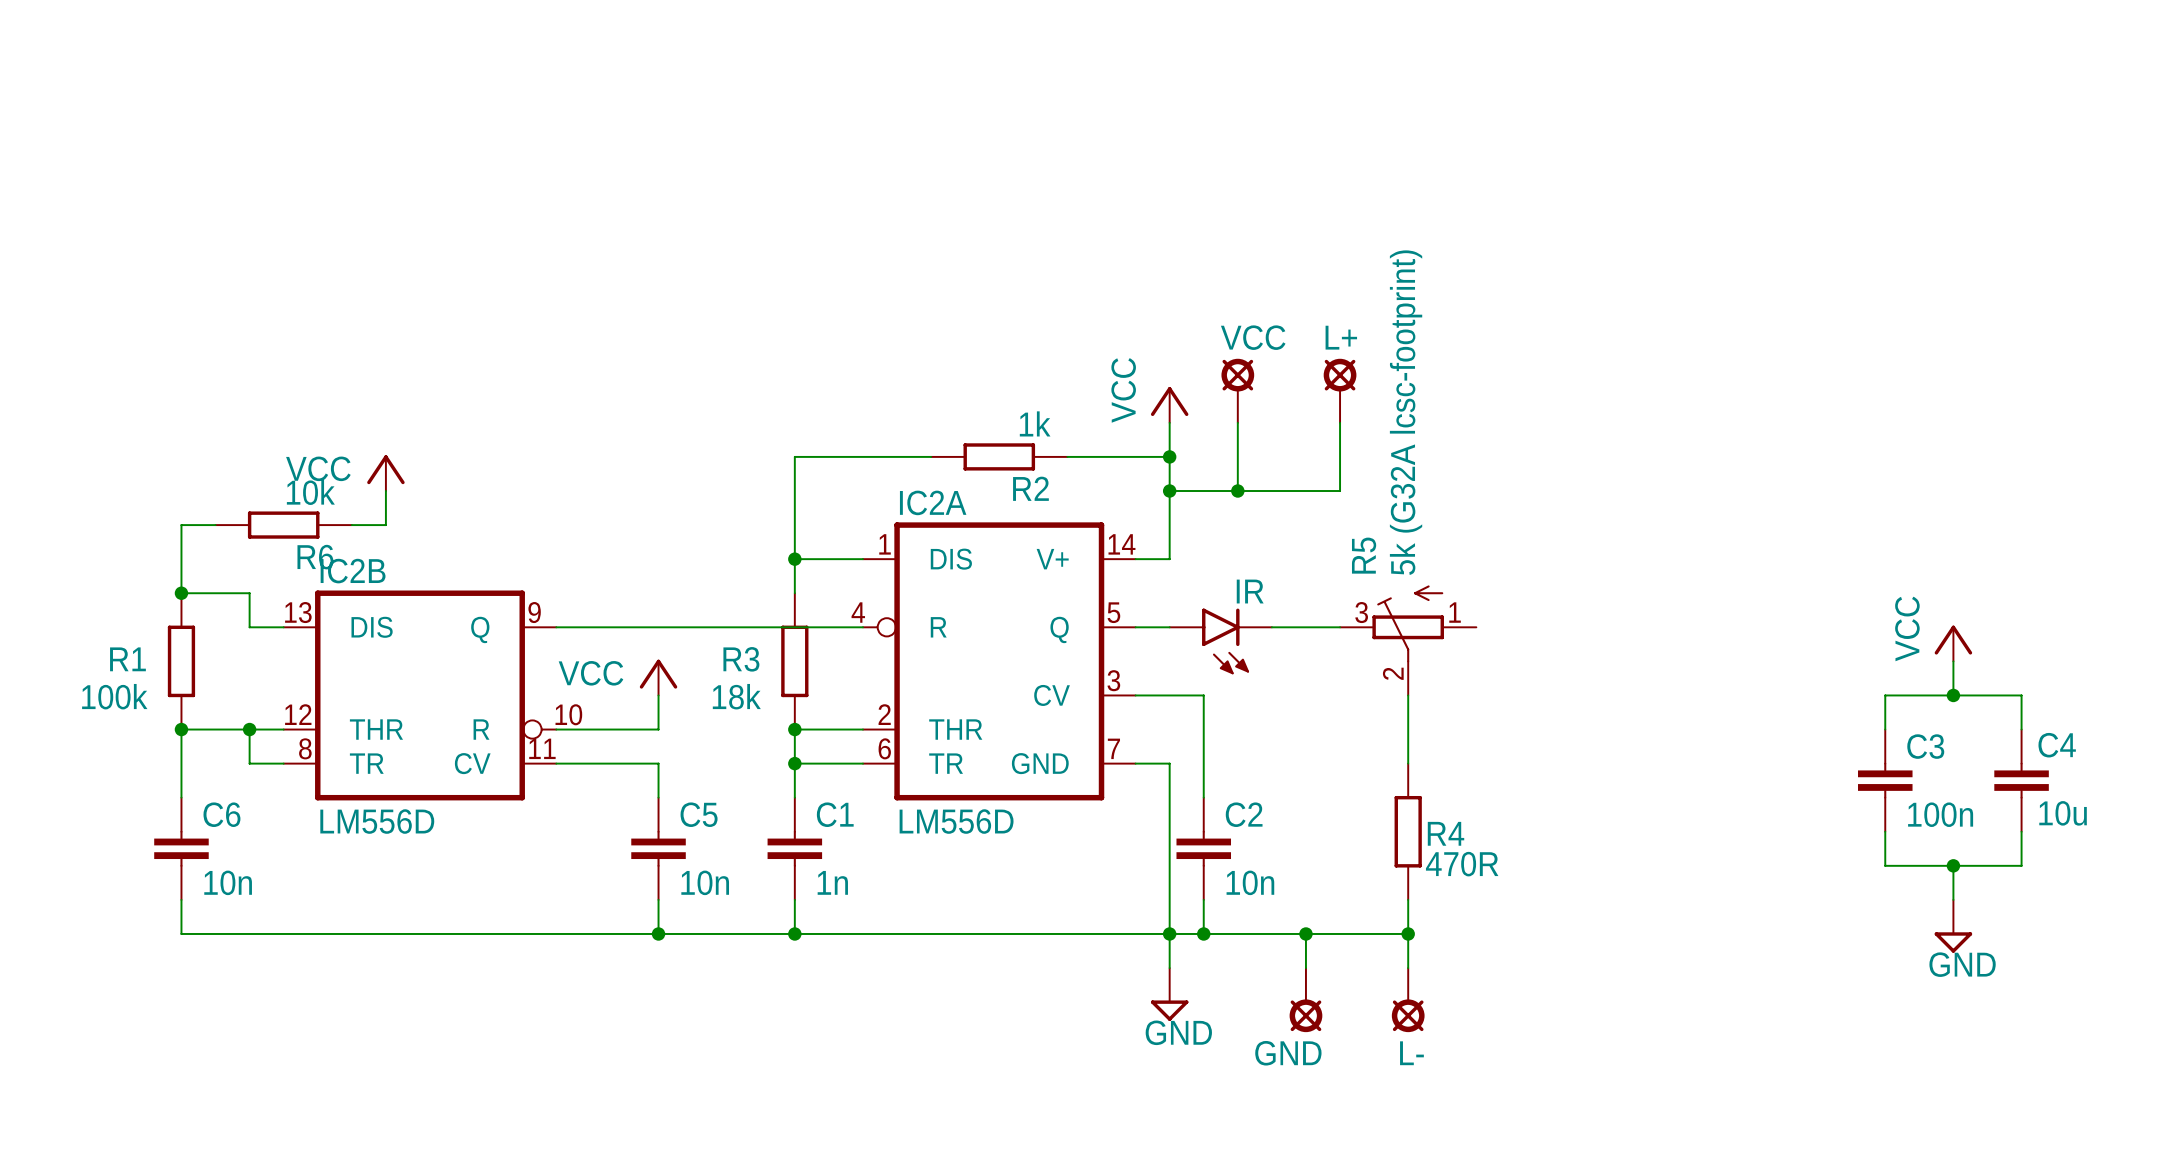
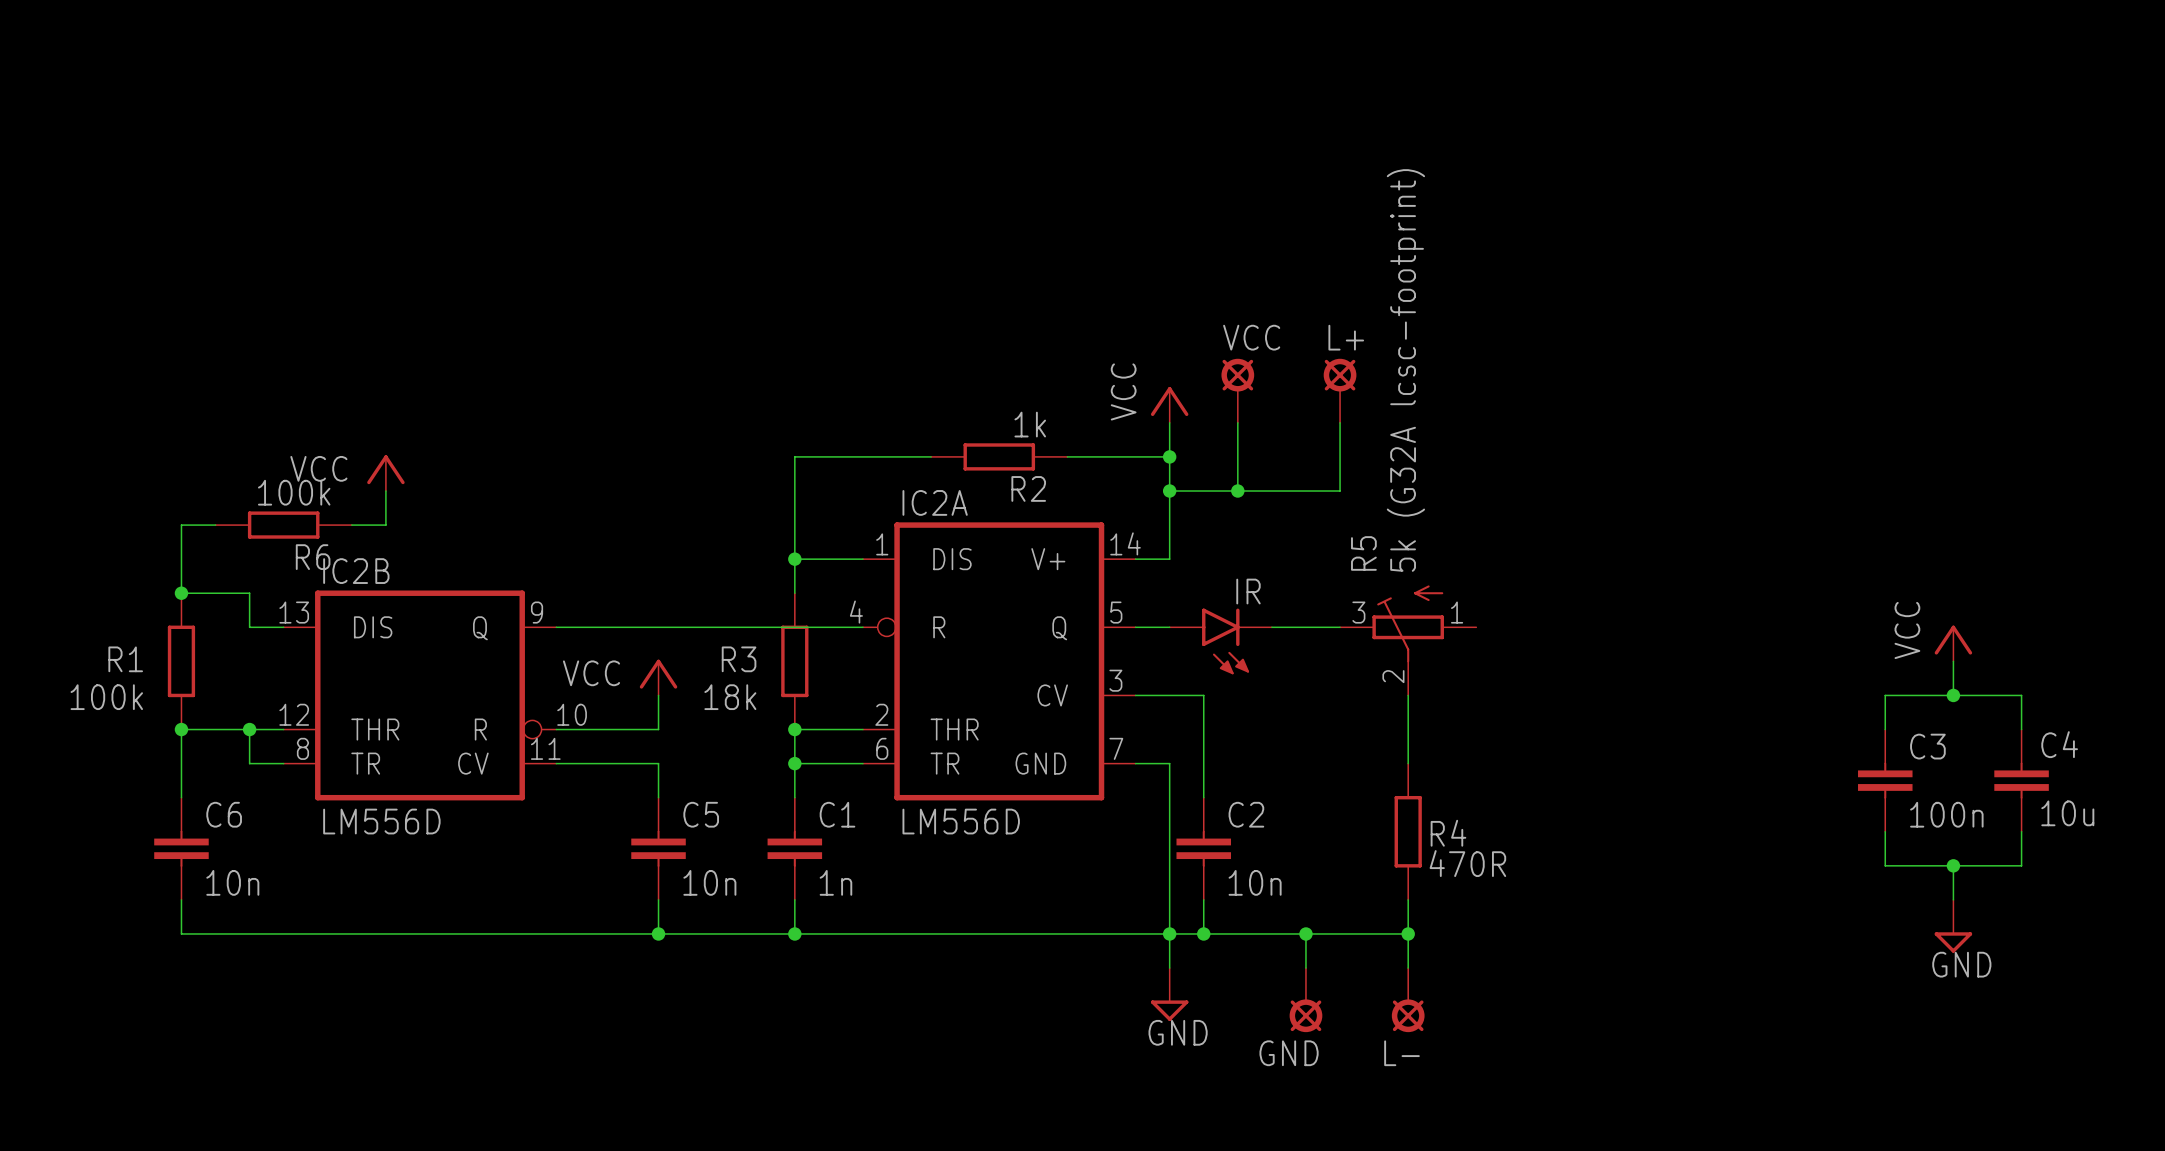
R6 value: 10k (310, 492) -> 100k (294, 492)

